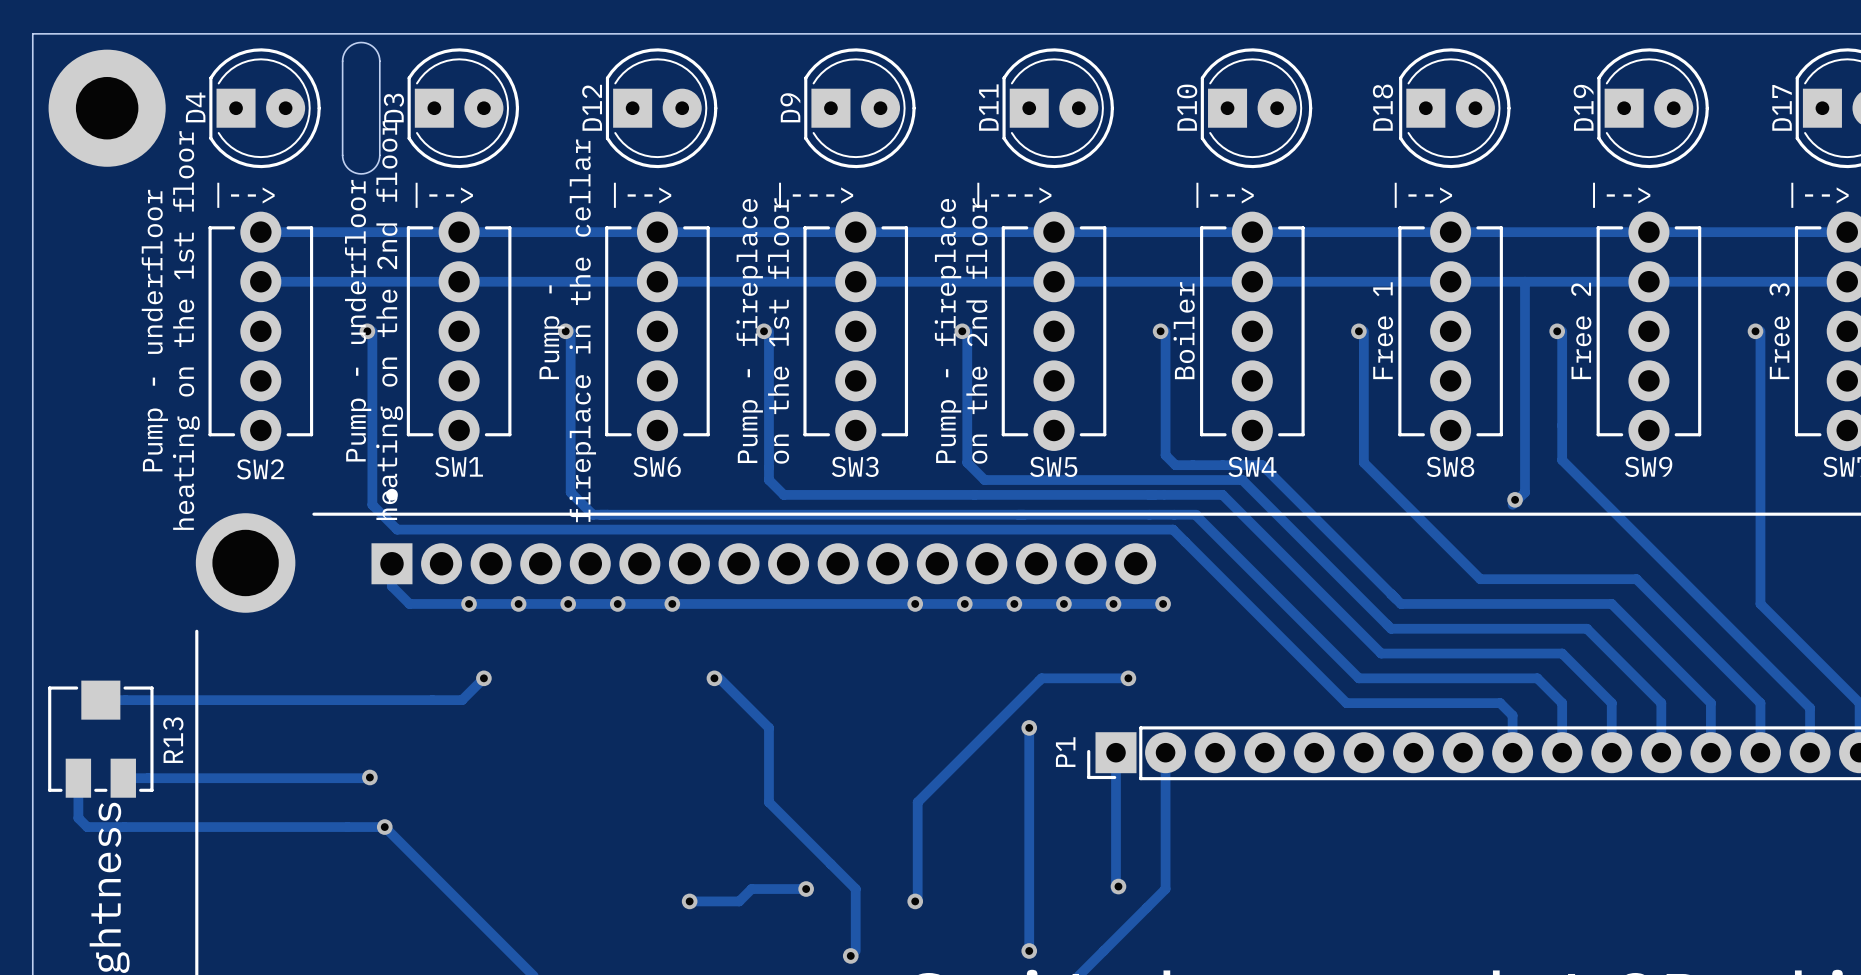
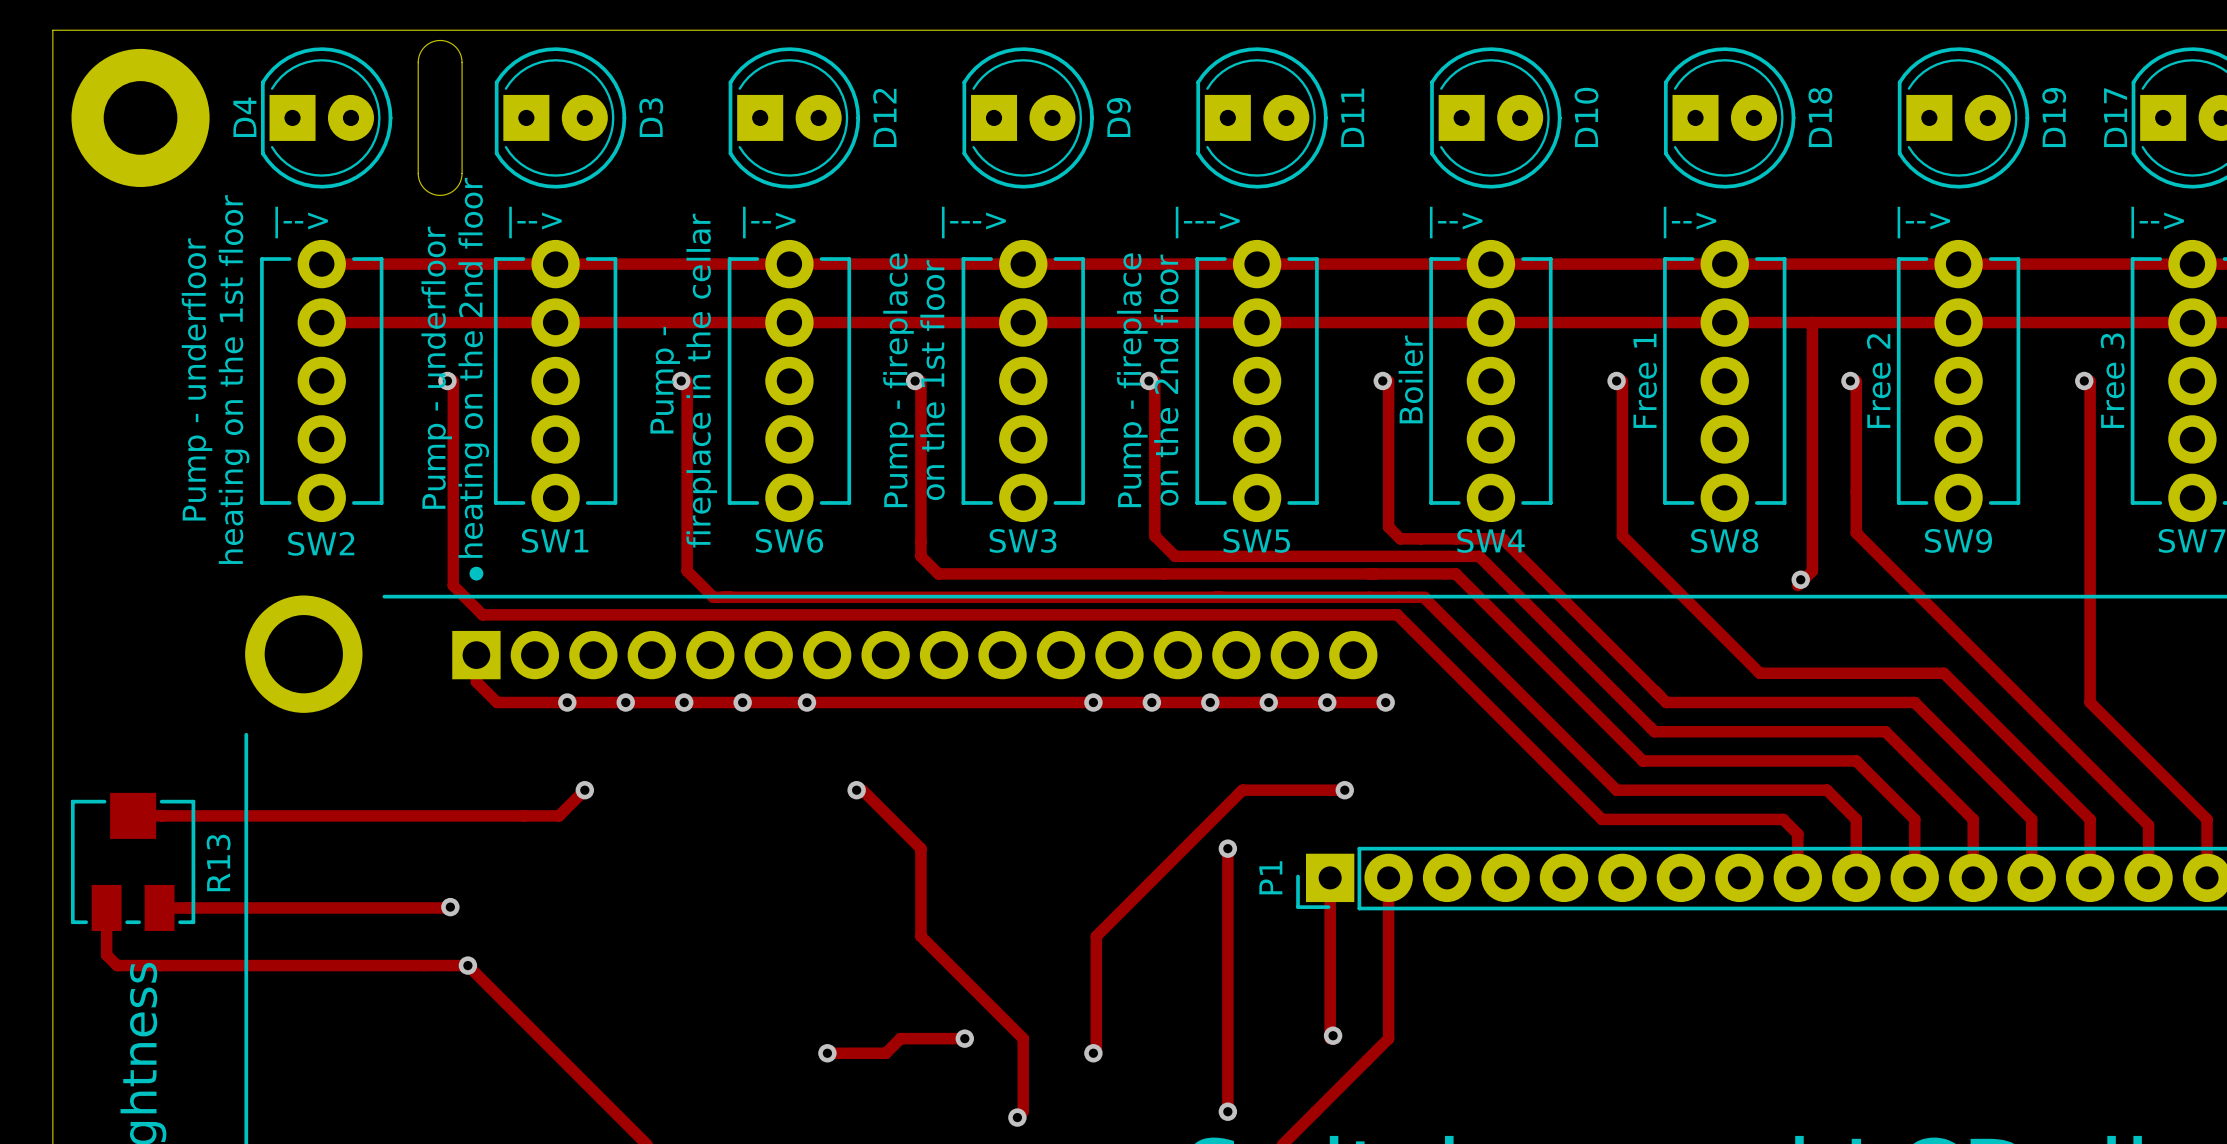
D12 name position: D12 (592, 107) -> D12 (884, 117)
D9 name position: D9 (790, 107) -> D9 (1118, 117)
D11 name position: D11 (988, 107) -> D11 (1352, 117)
D10 name position: D10 (1187, 107) -> D10 (1586, 117)
D18 name position: D18 (1382, 107) -> D18 (1820, 117)
D19 name position: D19 (1583, 107) -> D19 (2054, 117)
D3 name position: D3 (393, 108) -> D3 (651, 117)

